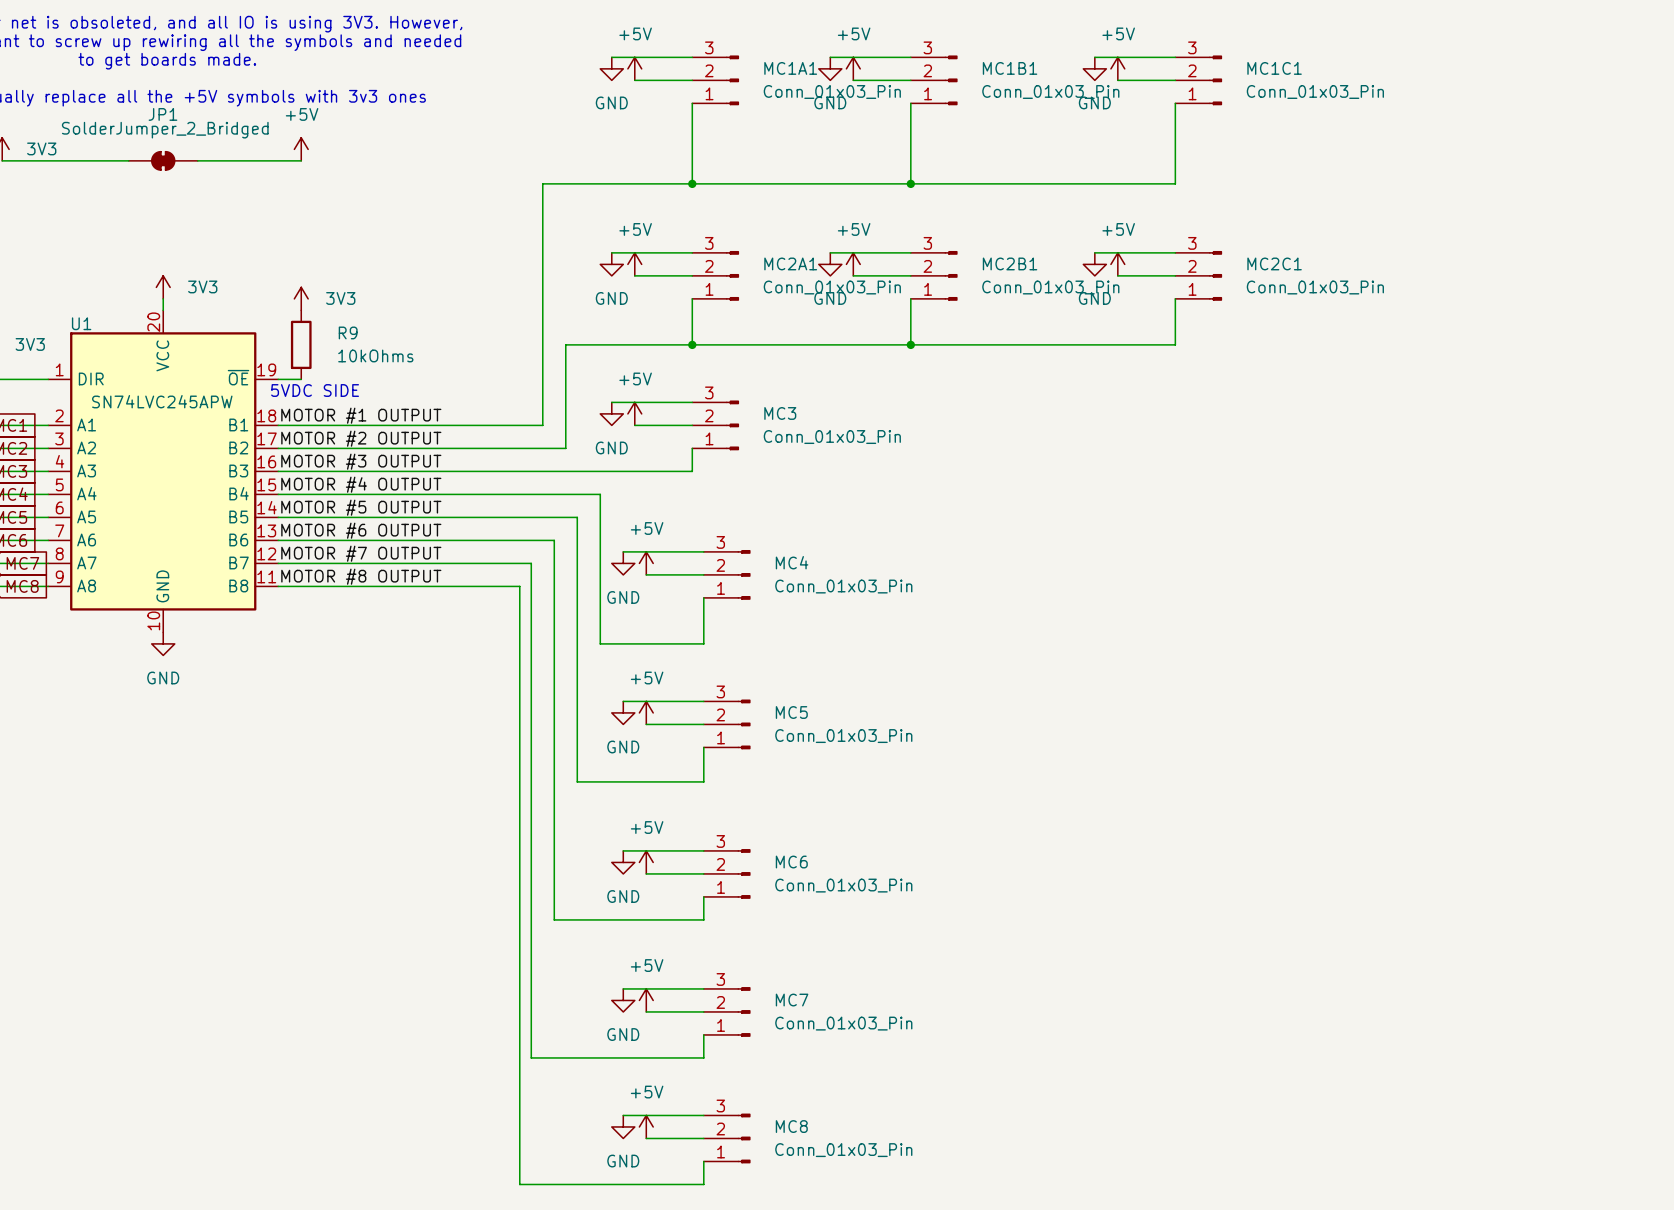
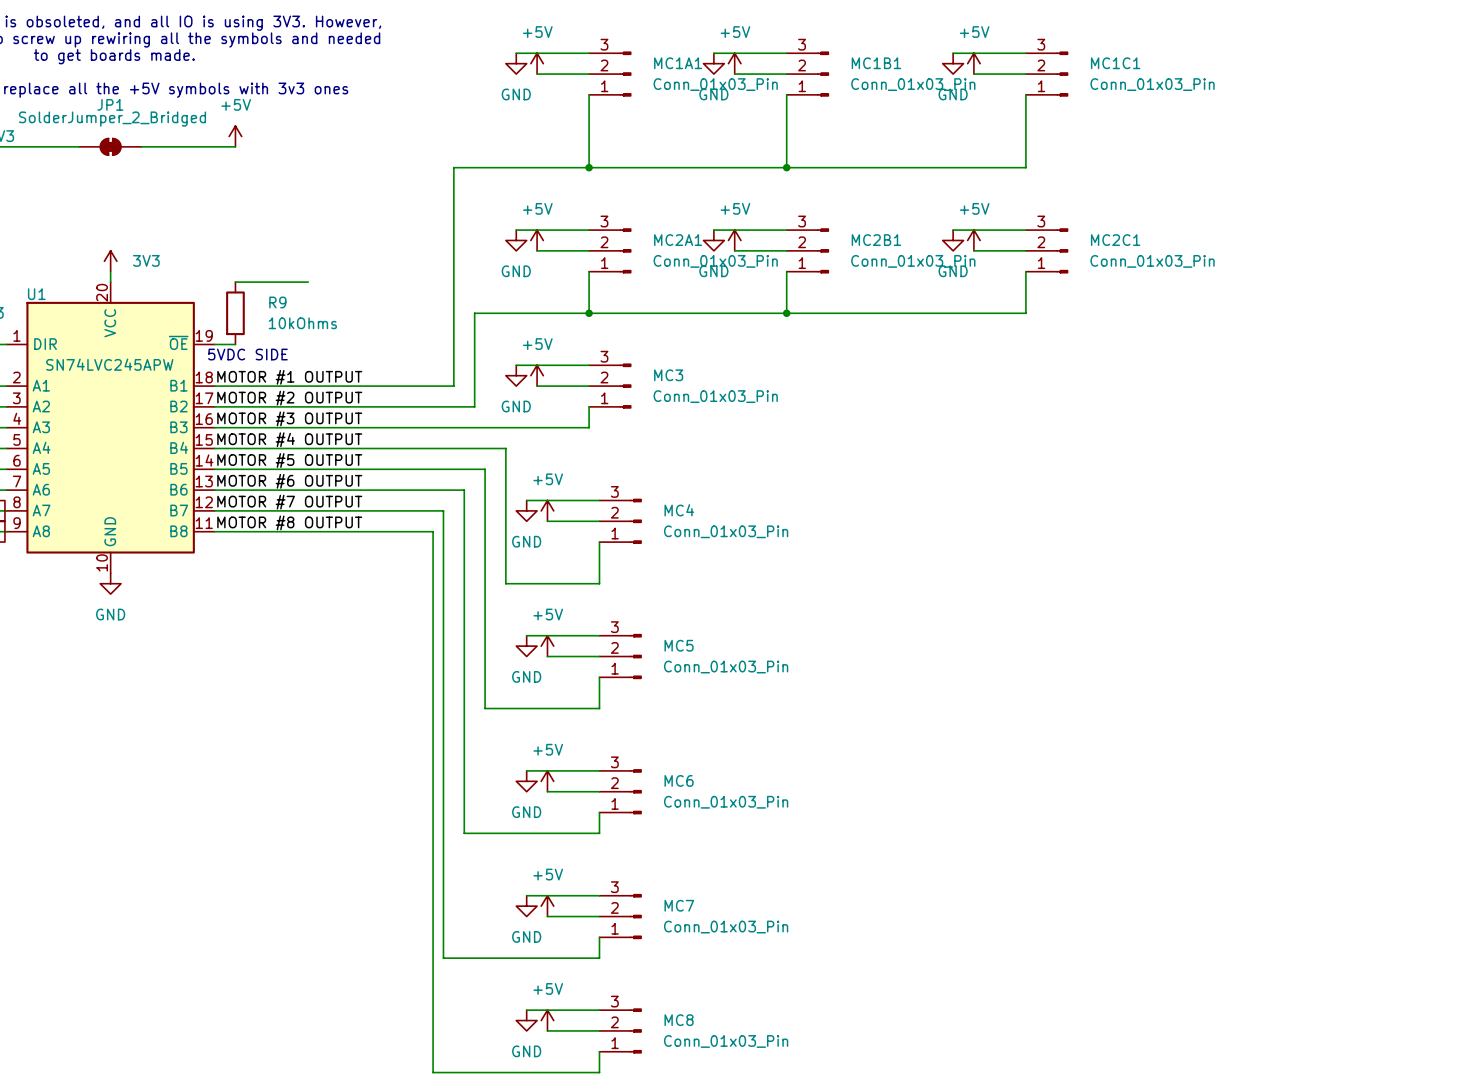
power symbol: 3V3 (301, 298) -> none
wire: none -> (235, 282) (308, 282)

